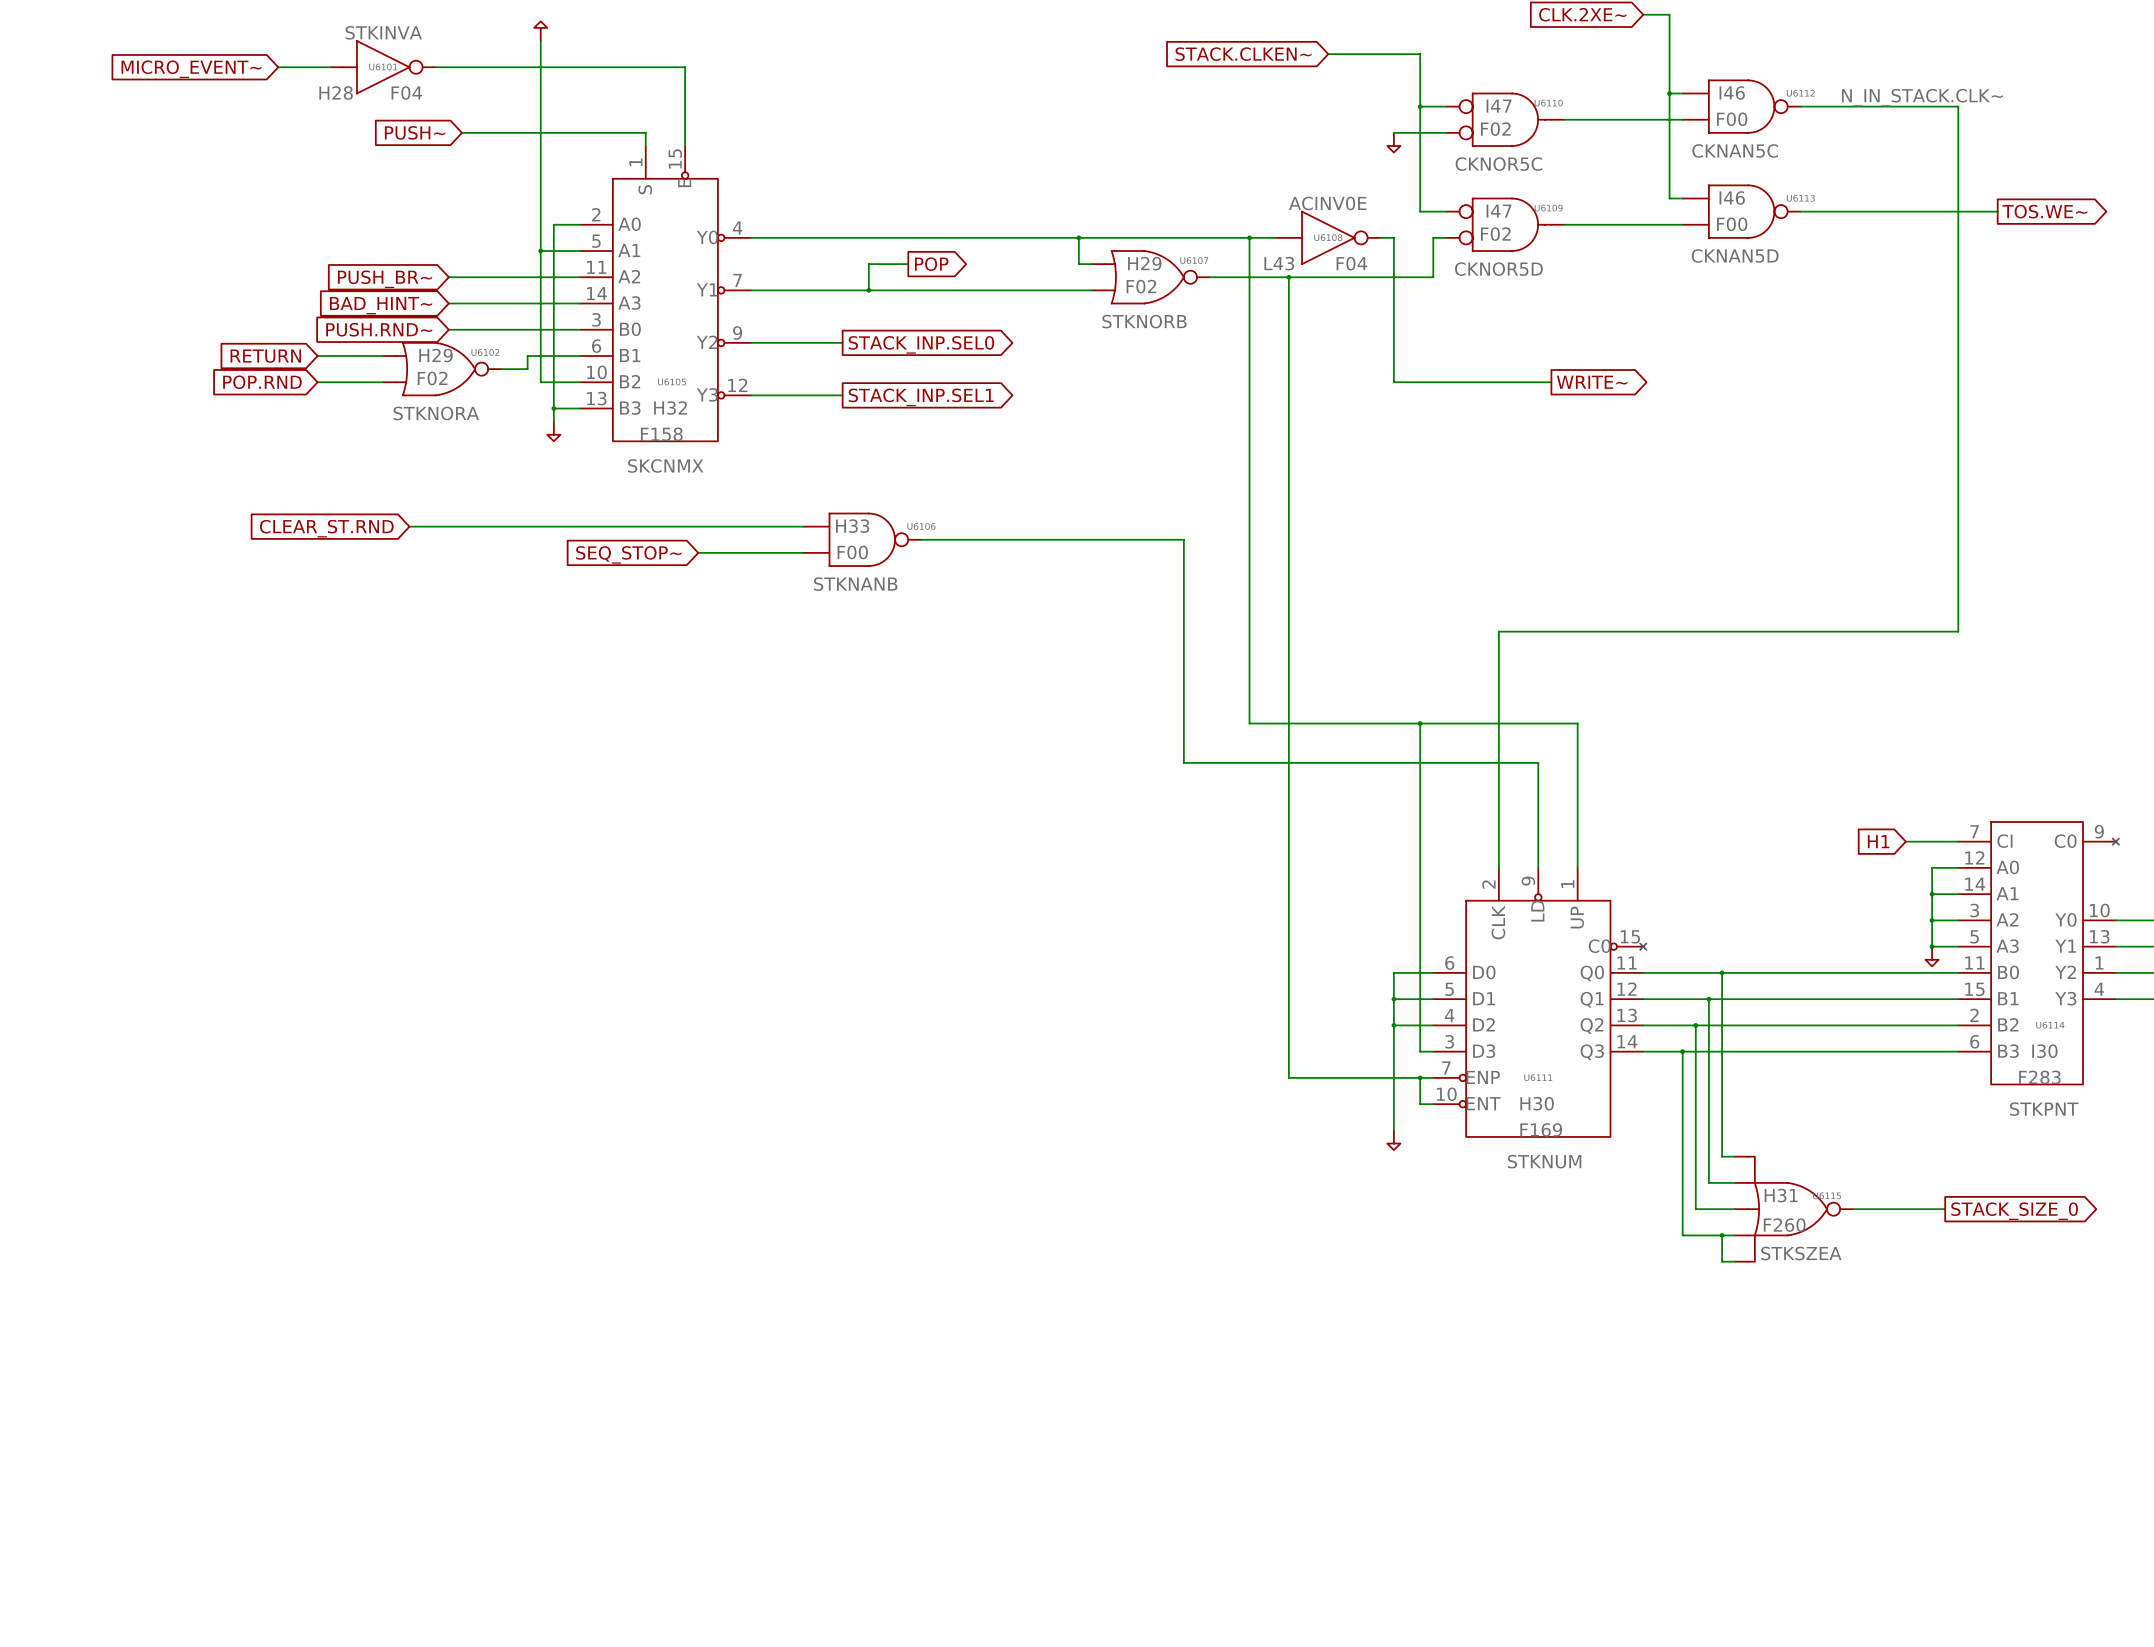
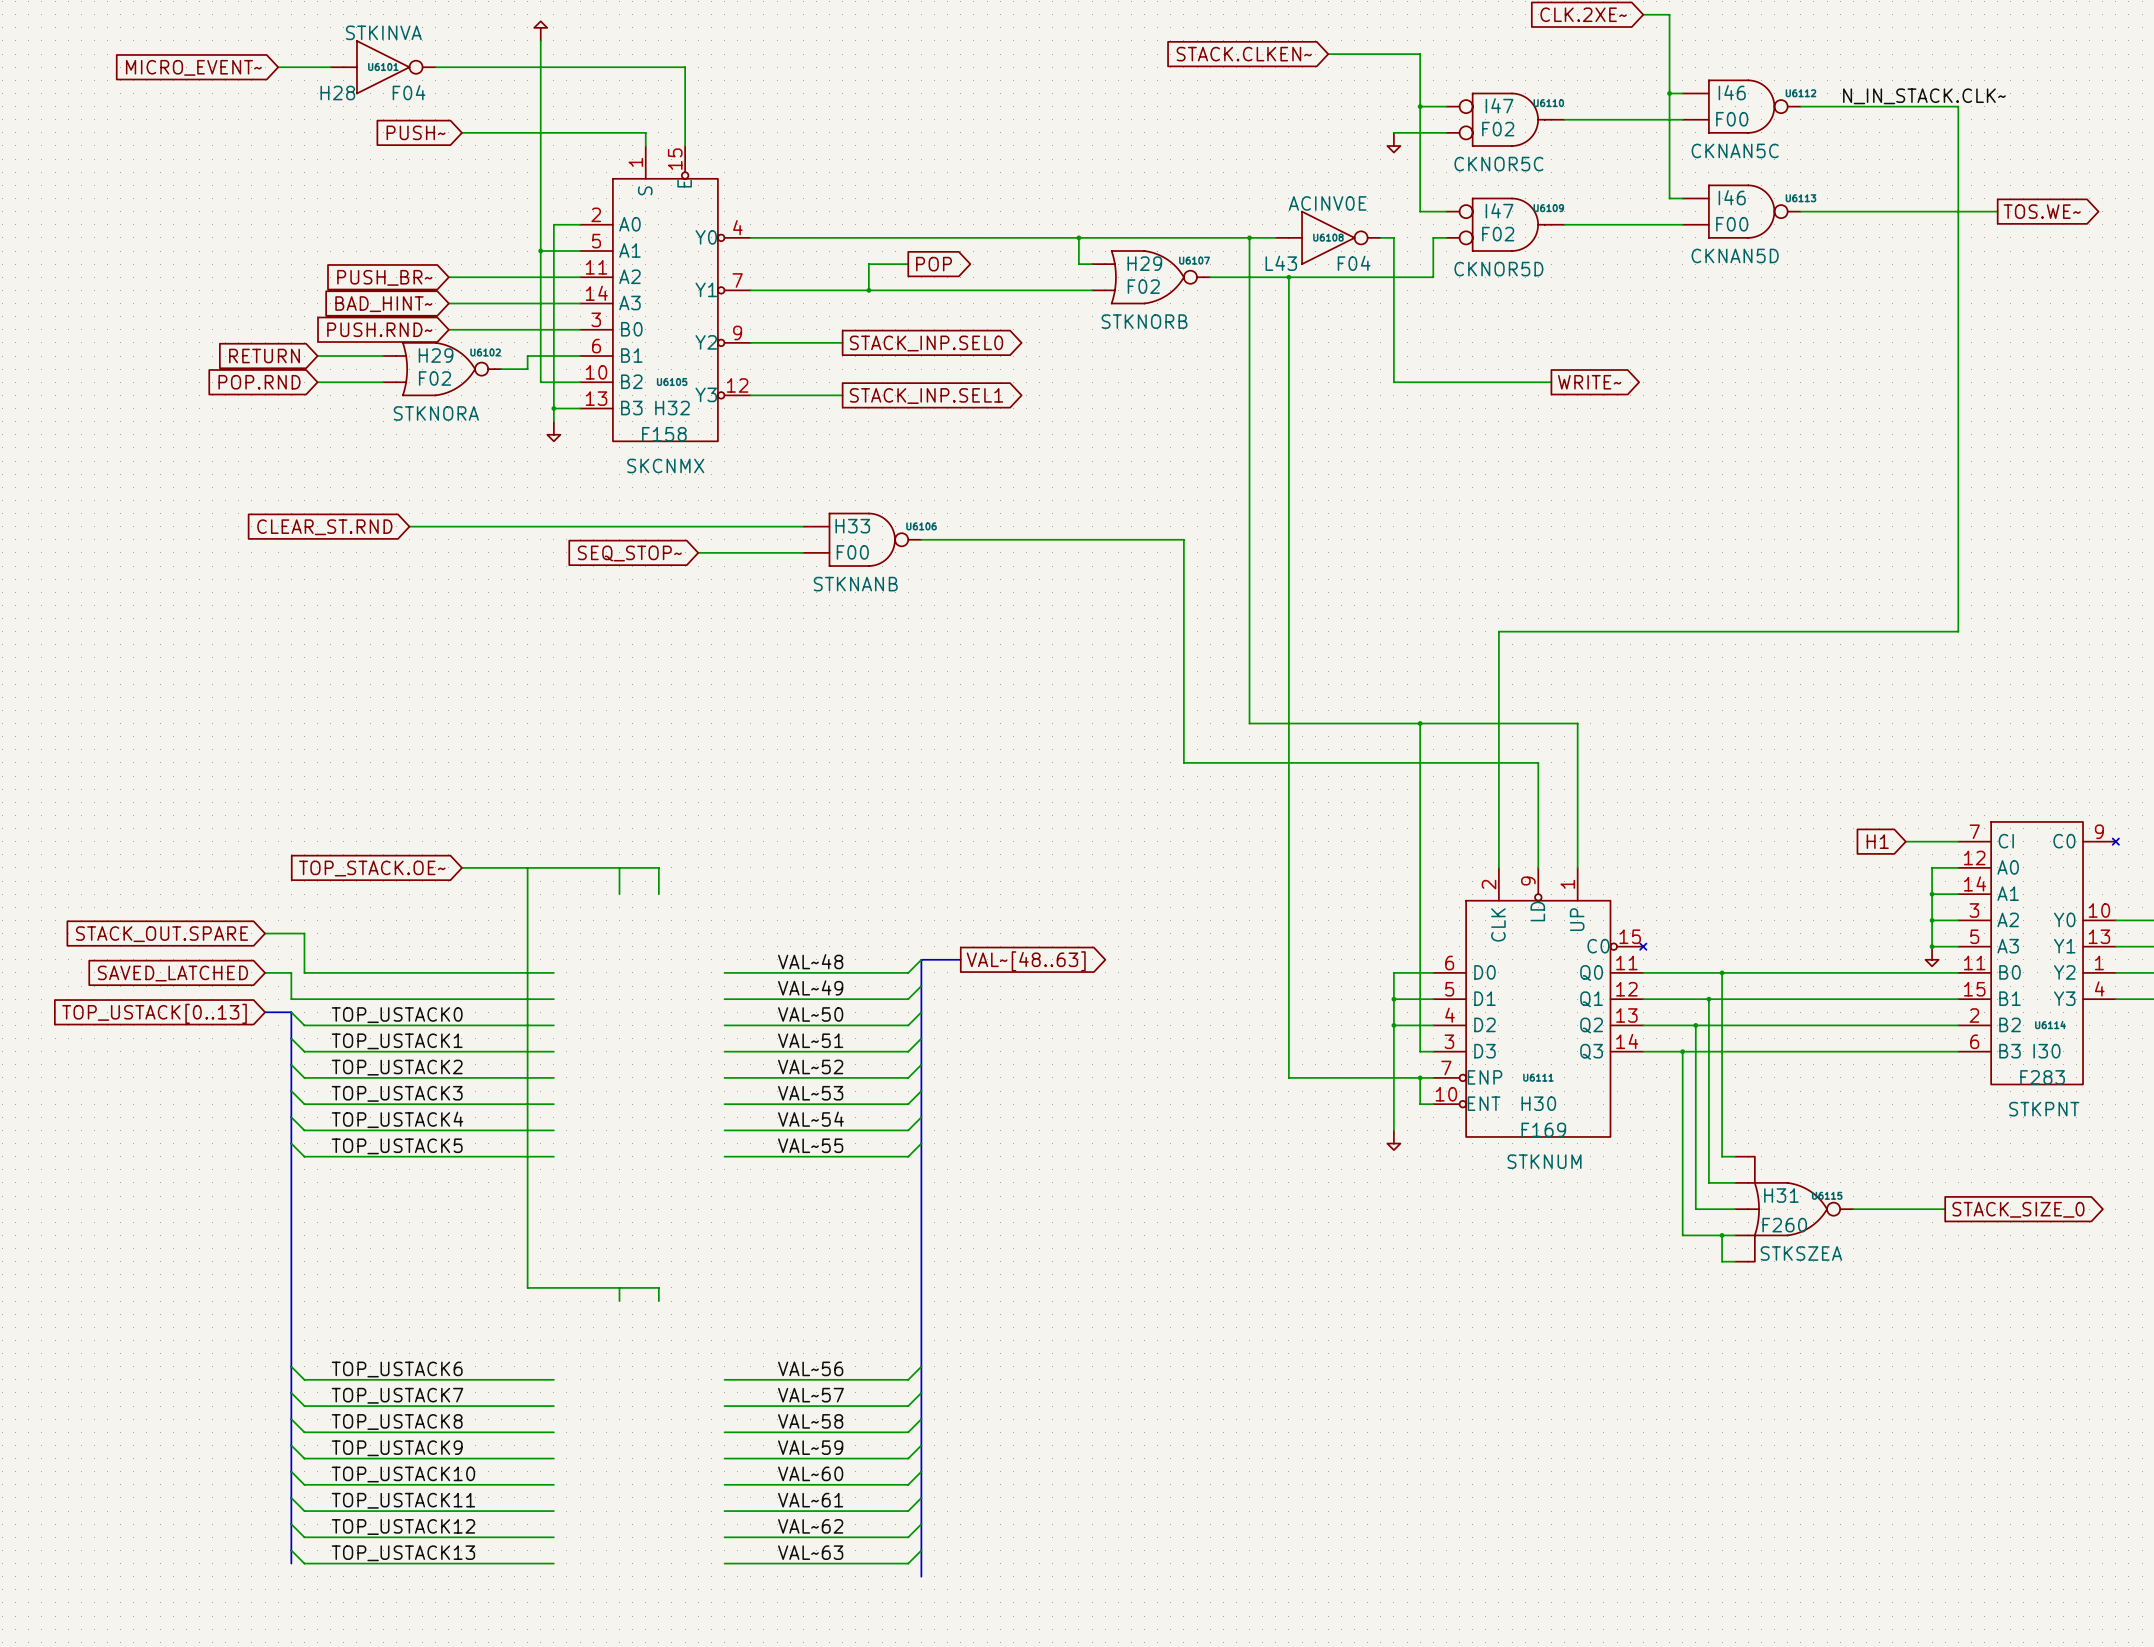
wire: none -> (461, 867) (658, 867) (658, 894)
wire: none -> (527, 867) (527, 1287) (658, 1287) (658, 1301)
wire: none -> (619, 867) (619, 894)
global label: none -> TOP_STACK.OE~ (372, 868)
wire: none -> (265, 933) (304, 933) (304, 972) (553, 972)
global label: none -> STACK_OUT.SPARE (161, 934)
wire: none -> (921, 959) (908, 972) (724, 972)
bus: none -> (960, 959) (921, 959) (921, 1576)
global label: none -> VAL~[48..63] (1026, 961)
label: none -> VAL~48 (810, 961)
wire: none -> (265, 972) (291, 972) (291, 999) (553, 999)
global label: none -> SAVED_LATCHED (172, 973)
wire: none -> (921, 986) (908, 999) (724, 999)
label: none -> VAL~49 (810, 987)
bus: none -> (265, 1012) (291, 1012) (291, 1563)
wire: none -> (291, 1012) (304, 1025) (553, 1025)
wire: none -> (921, 1012) (908, 1025) (724, 1025)
global label: none -> TOP_USTACK[0..13] (154, 1013)
label: none -> VAL~50 (810, 1014)
label: none -> TOP_USTACK0 (397, 1015)
wire: none -> (291, 1038) (304, 1051) (553, 1051)
wire: none -> (921, 1038) (908, 1051) (724, 1051)
label: none -> VAL~51 (810, 1040)
label: none -> TOP_USTACK1 (397, 1041)
wire: none -> (291, 1064) (304, 1077) (553, 1077)
wire: none -> (921, 1064) (908, 1077) (724, 1077)
label: none -> VAL~52 (810, 1066)
label: none -> TOP_USTACK2 (397, 1067)
wire: none -> (291, 1091) (304, 1104) (553, 1104)
wire: none -> (921, 1091) (908, 1104) (724, 1104)
label: none -> VAL~53 (810, 1093)
label: none -> TOP_USTACK3 (397, 1093)
wire: none -> (291, 1117) (304, 1130) (553, 1130)
wire: none -> (921, 1117) (908, 1130) (724, 1130)
label: none -> VAL~54 (810, 1119)
label: none -> TOP_USTACK4 (397, 1119)
wire: none -> (291, 1143) (304, 1156) (553, 1156)
wire: none -> (921, 1143) (908, 1156) (724, 1156)
label: none -> VAL~55 (810, 1145)
label: none -> TOP_USTACK5 (397, 1146)
wire: none -> (619, 1287) (619, 1301)
wire: none -> (291, 1366) (304, 1379) (553, 1379)
wire: none -> (921, 1366) (908, 1379) (724, 1379)
label: none -> VAL~56 (810, 1368)
label: none -> TOP_USTACK6 (397, 1369)
wire: none -> (291, 1392) (304, 1406) (553, 1406)
wire: none -> (921, 1392) (908, 1406) (724, 1406)
label: none -> VAL~57 (810, 1395)
label: none -> TOP_USTACK7 (397, 1395)
wire: none -> (291, 1419) (304, 1432) (553, 1432)
wire: none -> (921, 1419) (908, 1432) (724, 1432)
label: none -> VAL~58 (810, 1421)
label: none -> TOP_USTACK8 (397, 1422)
wire: none -> (291, 1445) (304, 1458) (553, 1458)
wire: none -> (921, 1445) (908, 1458) (724, 1458)
label: none -> VAL~59 (810, 1447)
label: none -> TOP_USTACK9 (397, 1448)
wire: none -> (291, 1471) (304, 1484) (553, 1484)
wire: none -> (921, 1471) (908, 1484) (724, 1484)
label: none -> VAL~60 (810, 1473)
label: none -> TOP_USTACK10 (403, 1474)
wire: none -> (291, 1497) (304, 1511) (553, 1511)
wire: none -> (921, 1497) (908, 1511) (724, 1511)
label: none -> VAL~61 (810, 1500)
label: none -> TOP_USTACK11 (403, 1500)
wire: none -> (291, 1524) (304, 1537) (553, 1537)
wire: none -> (921, 1524) (908, 1537) (724, 1537)
label: none -> VAL~62 (810, 1526)
label: none -> TOP_USTACK12 (403, 1527)
wire: none -> (291, 1550) (304, 1563) (553, 1563)
wire: none -> (921, 1550) (908, 1563) (724, 1563)
label: none -> VAL~63 (810, 1552)
label: none -> TOP_USTACK13 (403, 1553)

